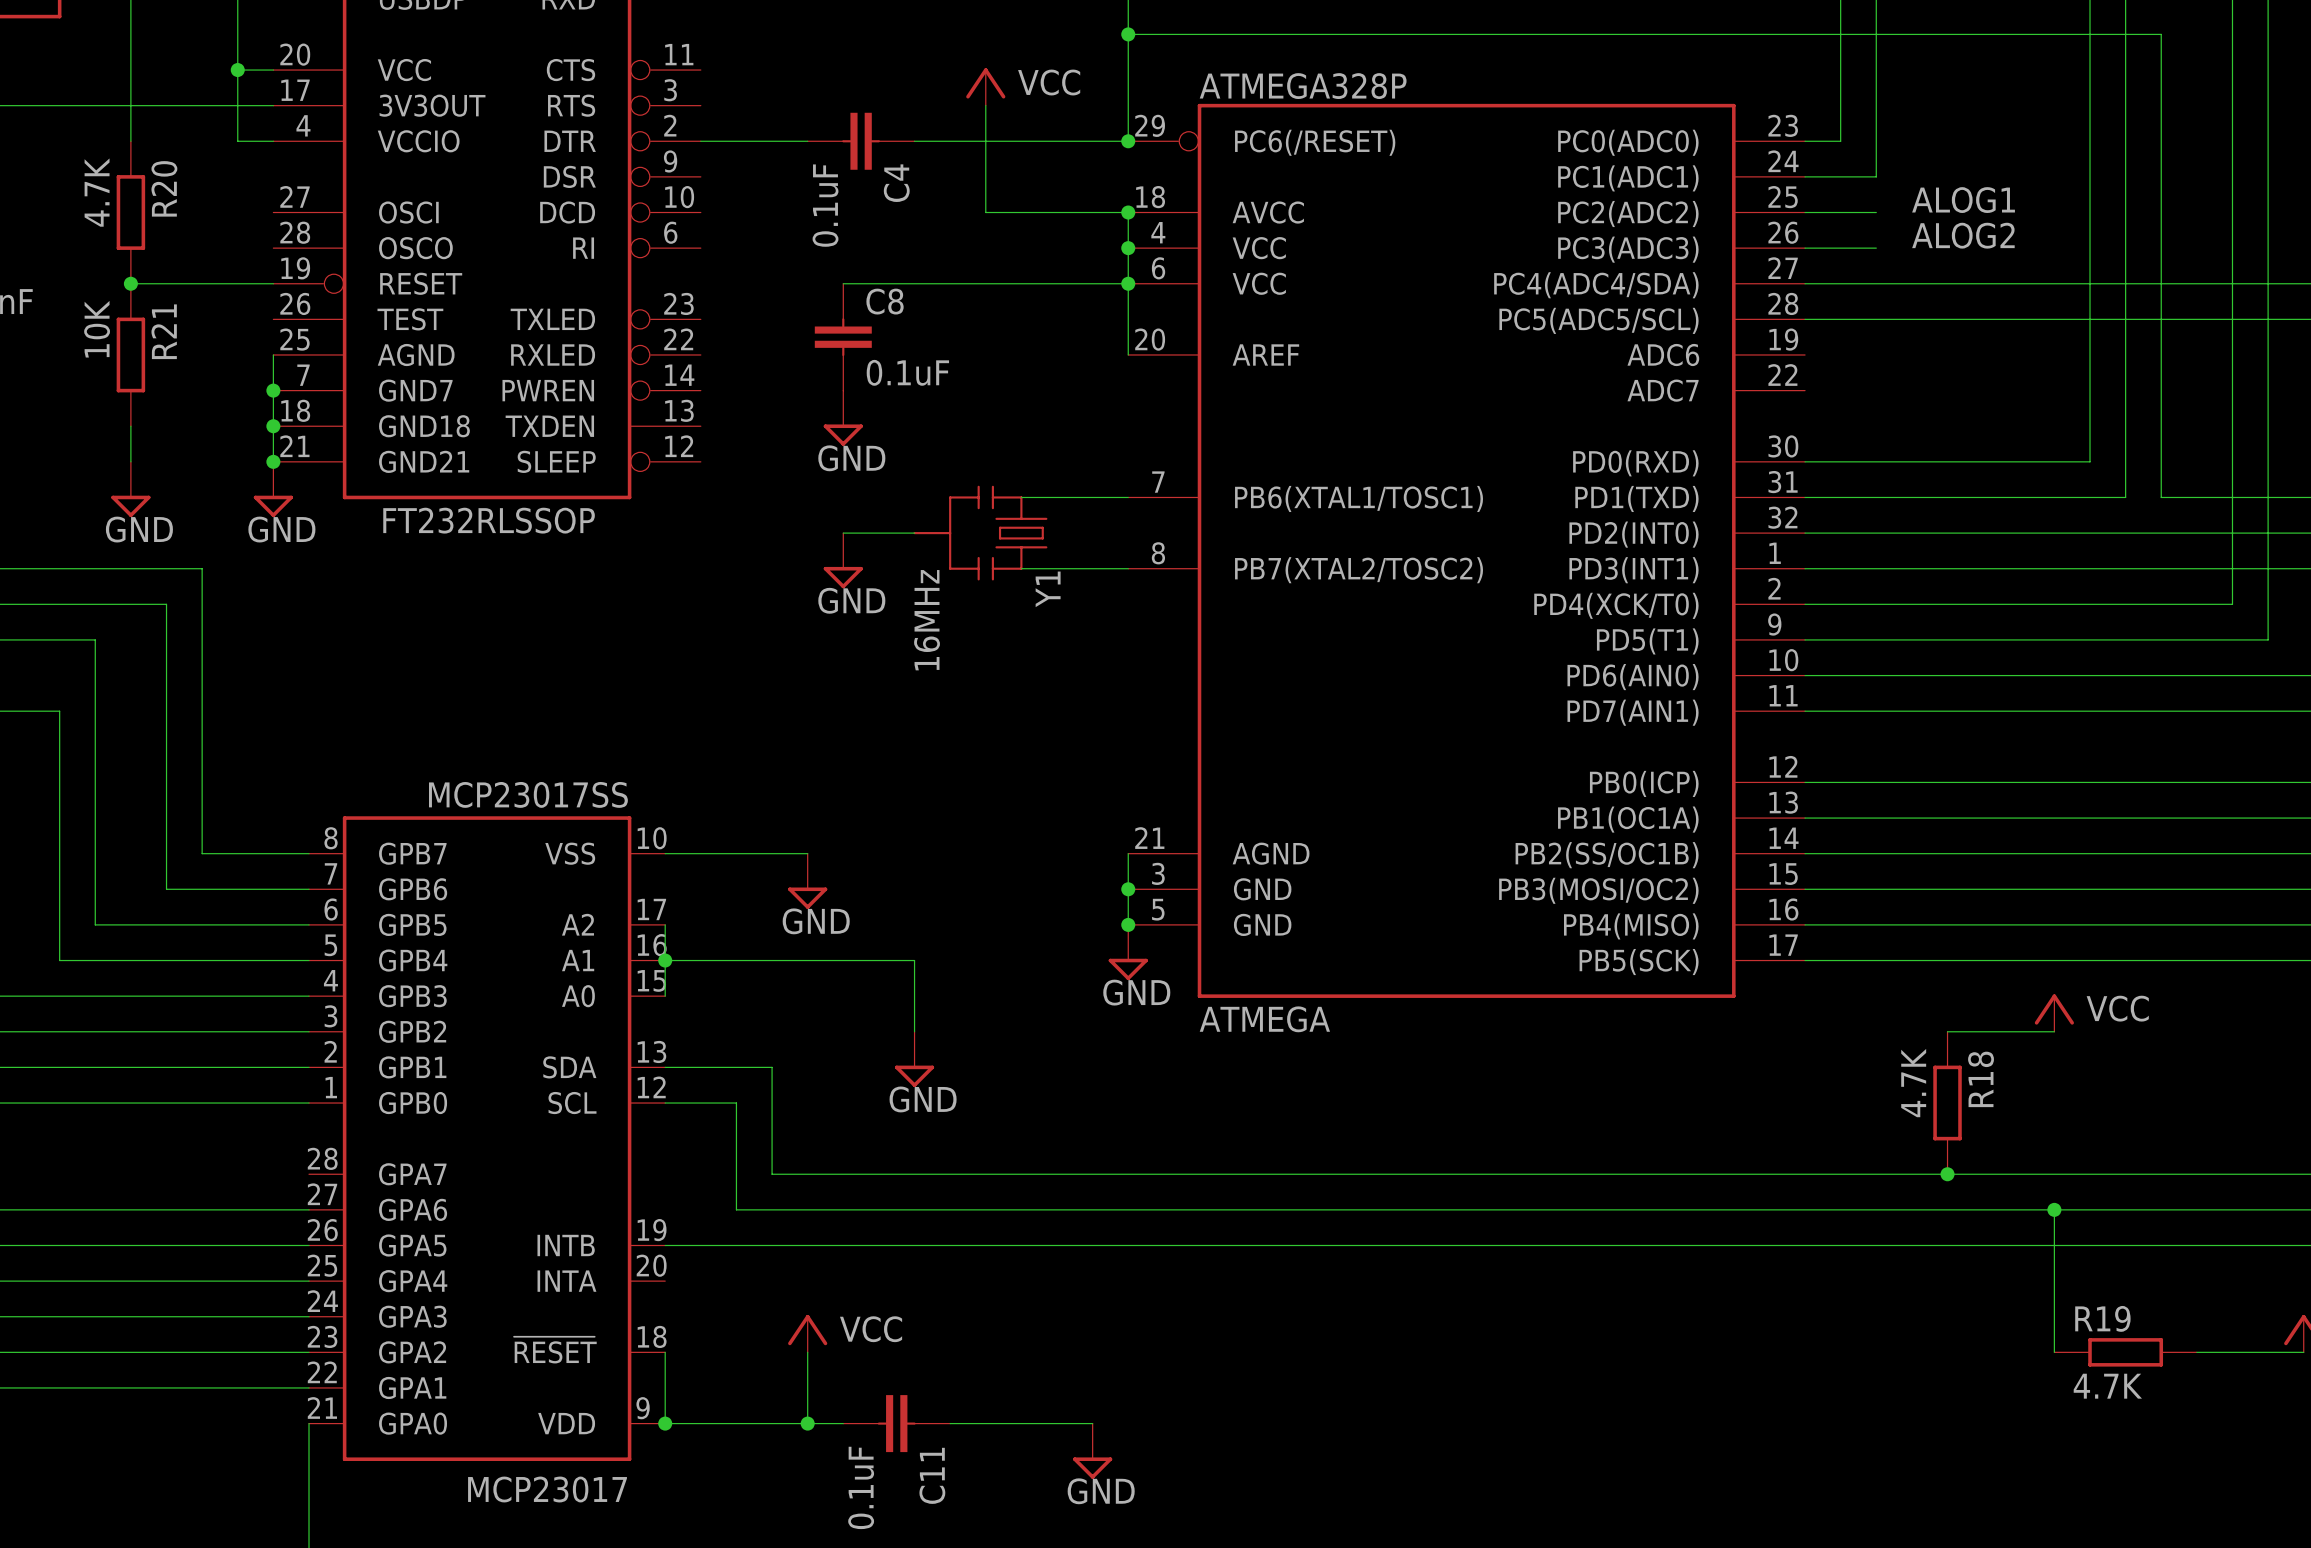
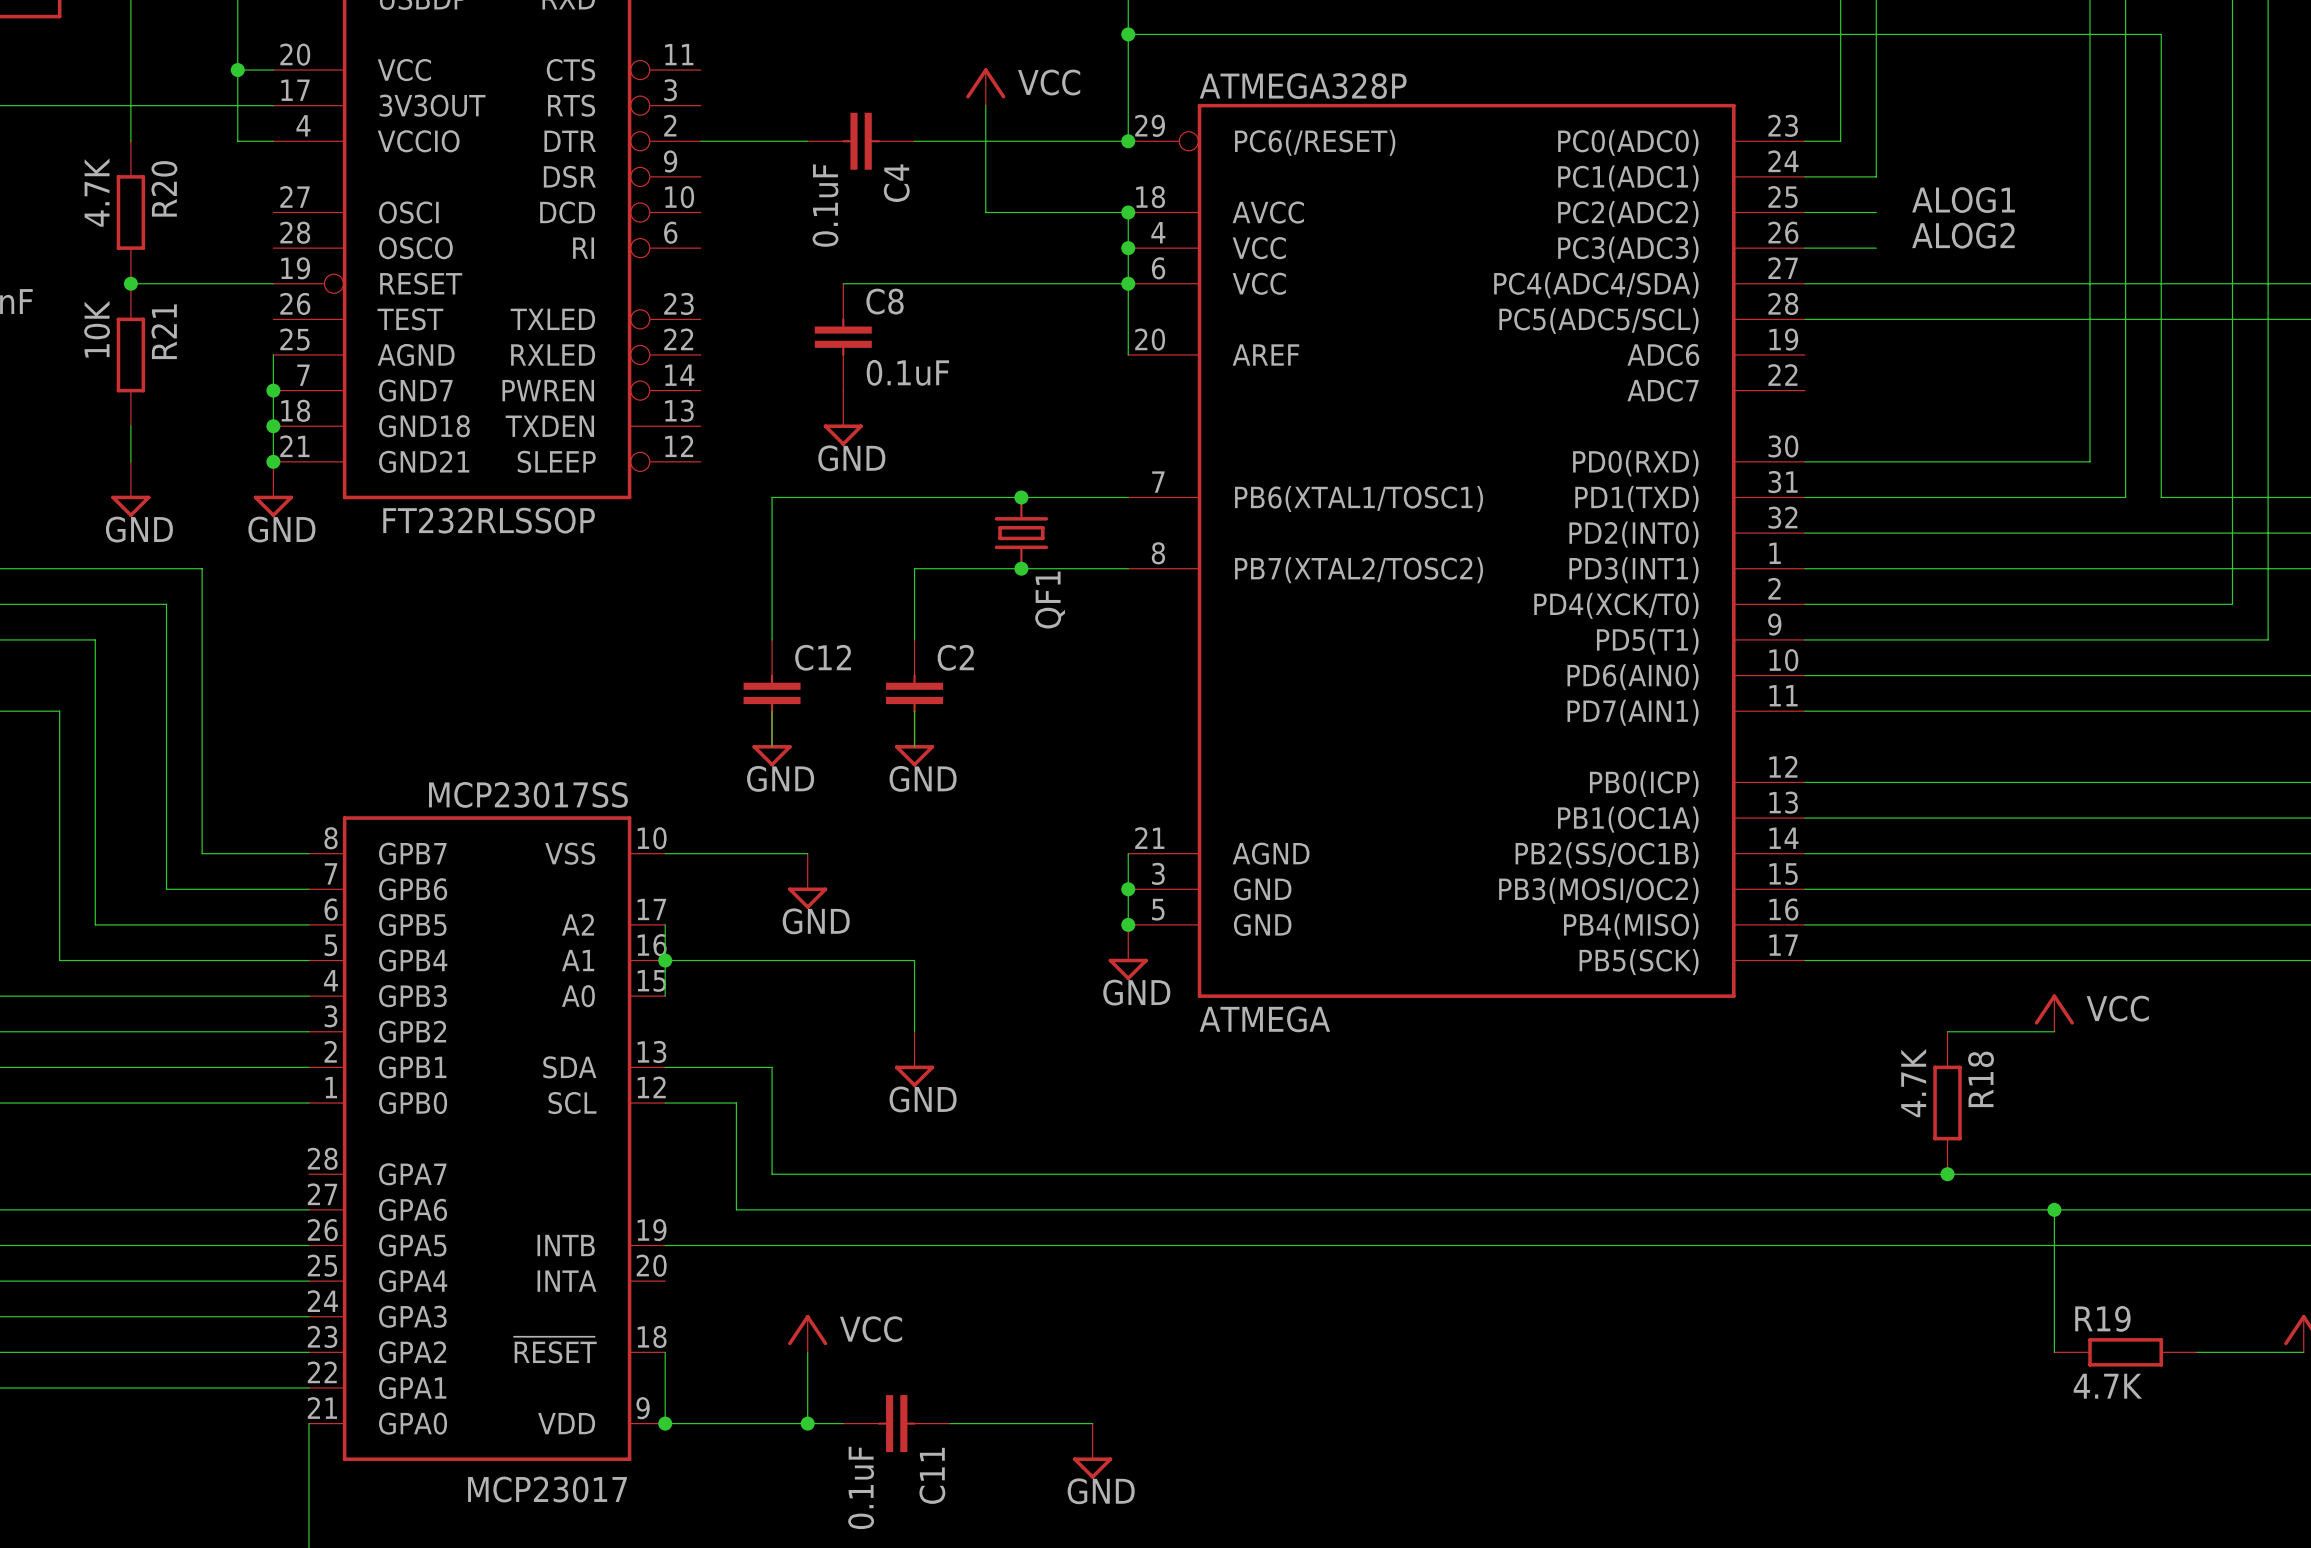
wire: none -> (1021, 497) (772, 497) (772, 639)
junction: none -> (1021, 497)
wire: (843, 533) (914, 533) -> none
Y1: 16MHz (980, 533) -> none
QF1: none -> (1021, 533)
power symbol: GND (843, 560) -> none
wire: none -> (1021, 568) (914, 568) (914, 639)
junction: none -> (1021, 568)
C12: none -> (772, 693)
C2: none -> (914, 693)
wire: none -> (772, 711) (772, 746)
wire: none -> (914, 711) (914, 746)
power symbol: none -> GND (772, 738)
power symbol: none -> GND (914, 738)

